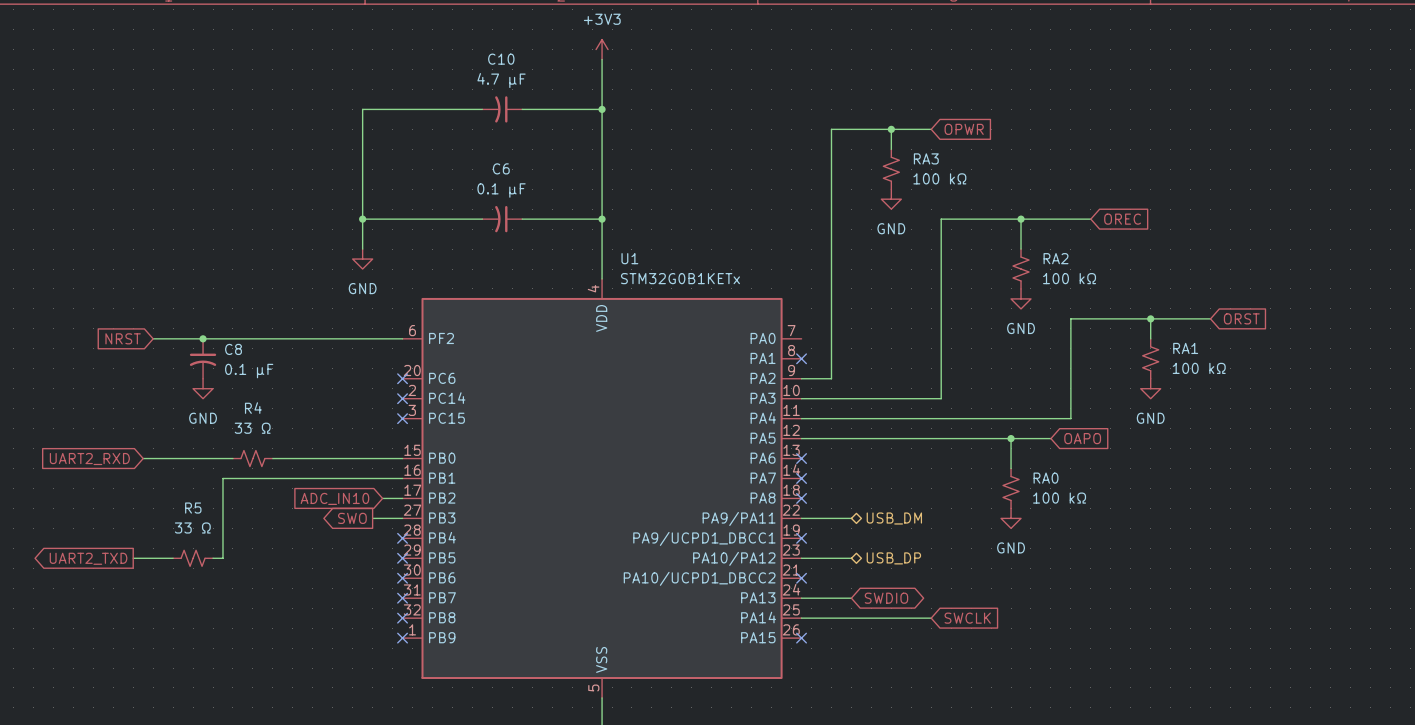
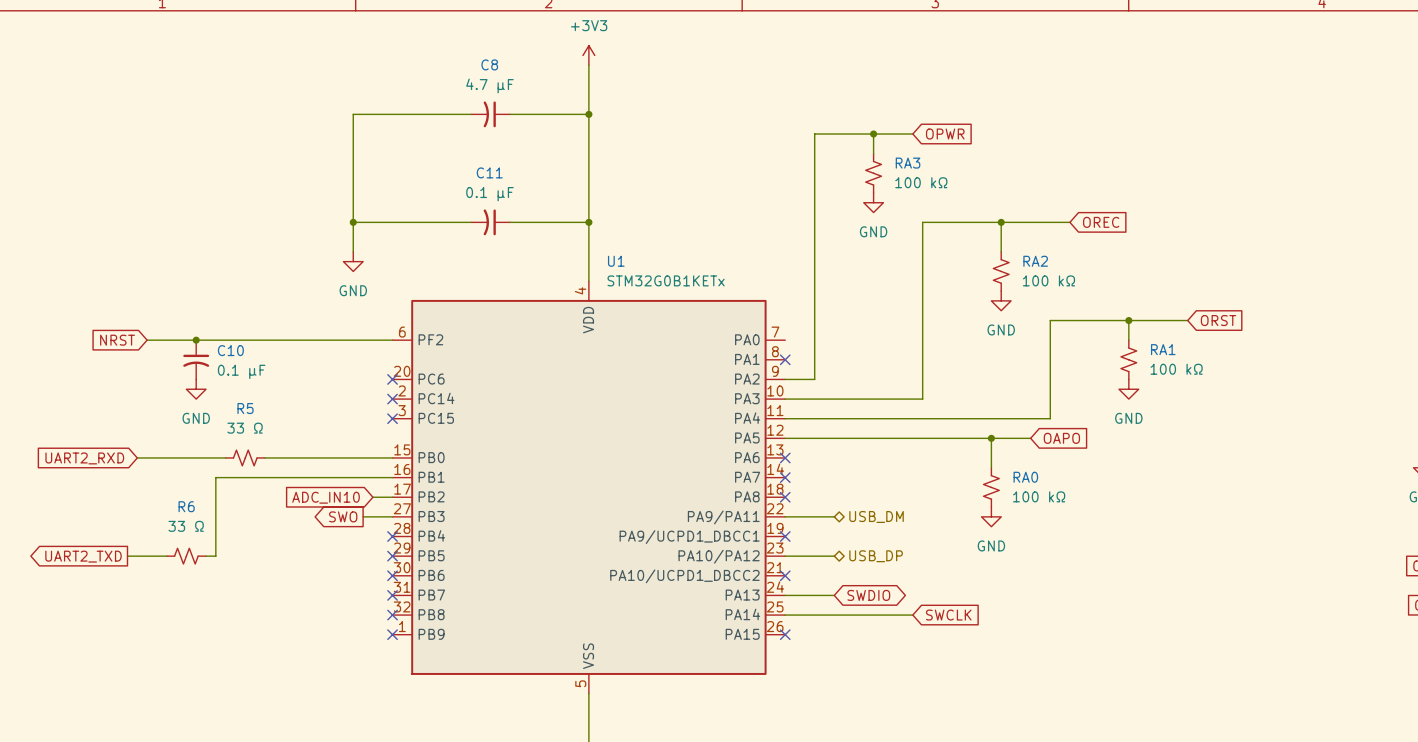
C10 name: C10 (501, 59) -> C8 (489, 64)
C6 name: C6 (501, 168) -> C11 (489, 172)
C8 name: C8 (233, 349) -> C10 (230, 350)
R4 name: R4 (253, 408) -> R5 (245, 408)
R5 name: R5 (193, 508) -> R6 (186, 506)

